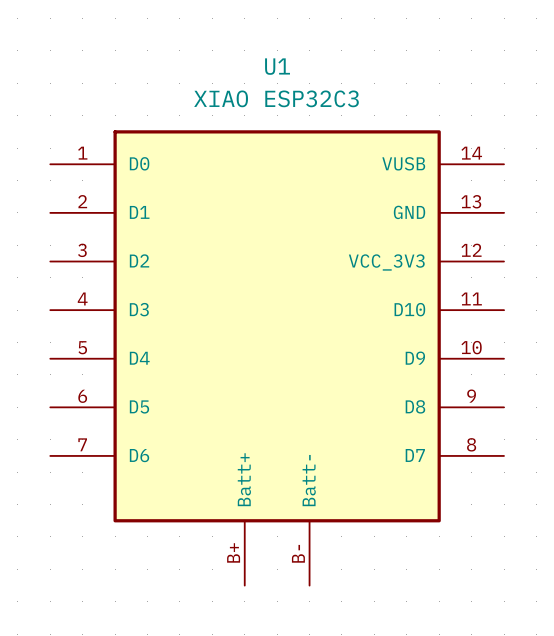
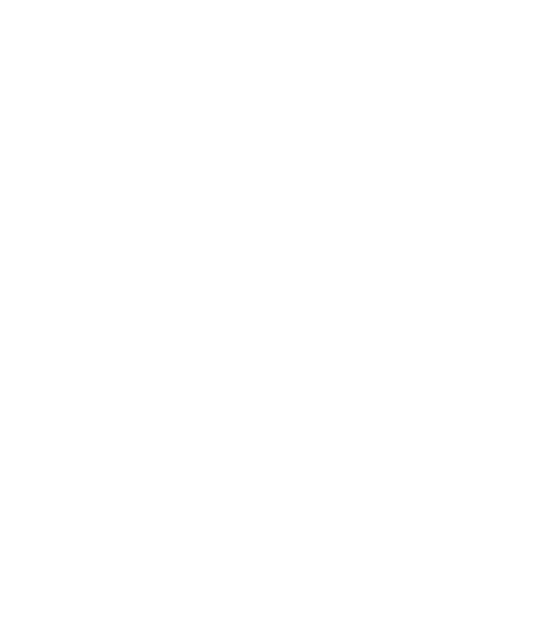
U1: XIAO ESP32C3 (277, 357) -> none

